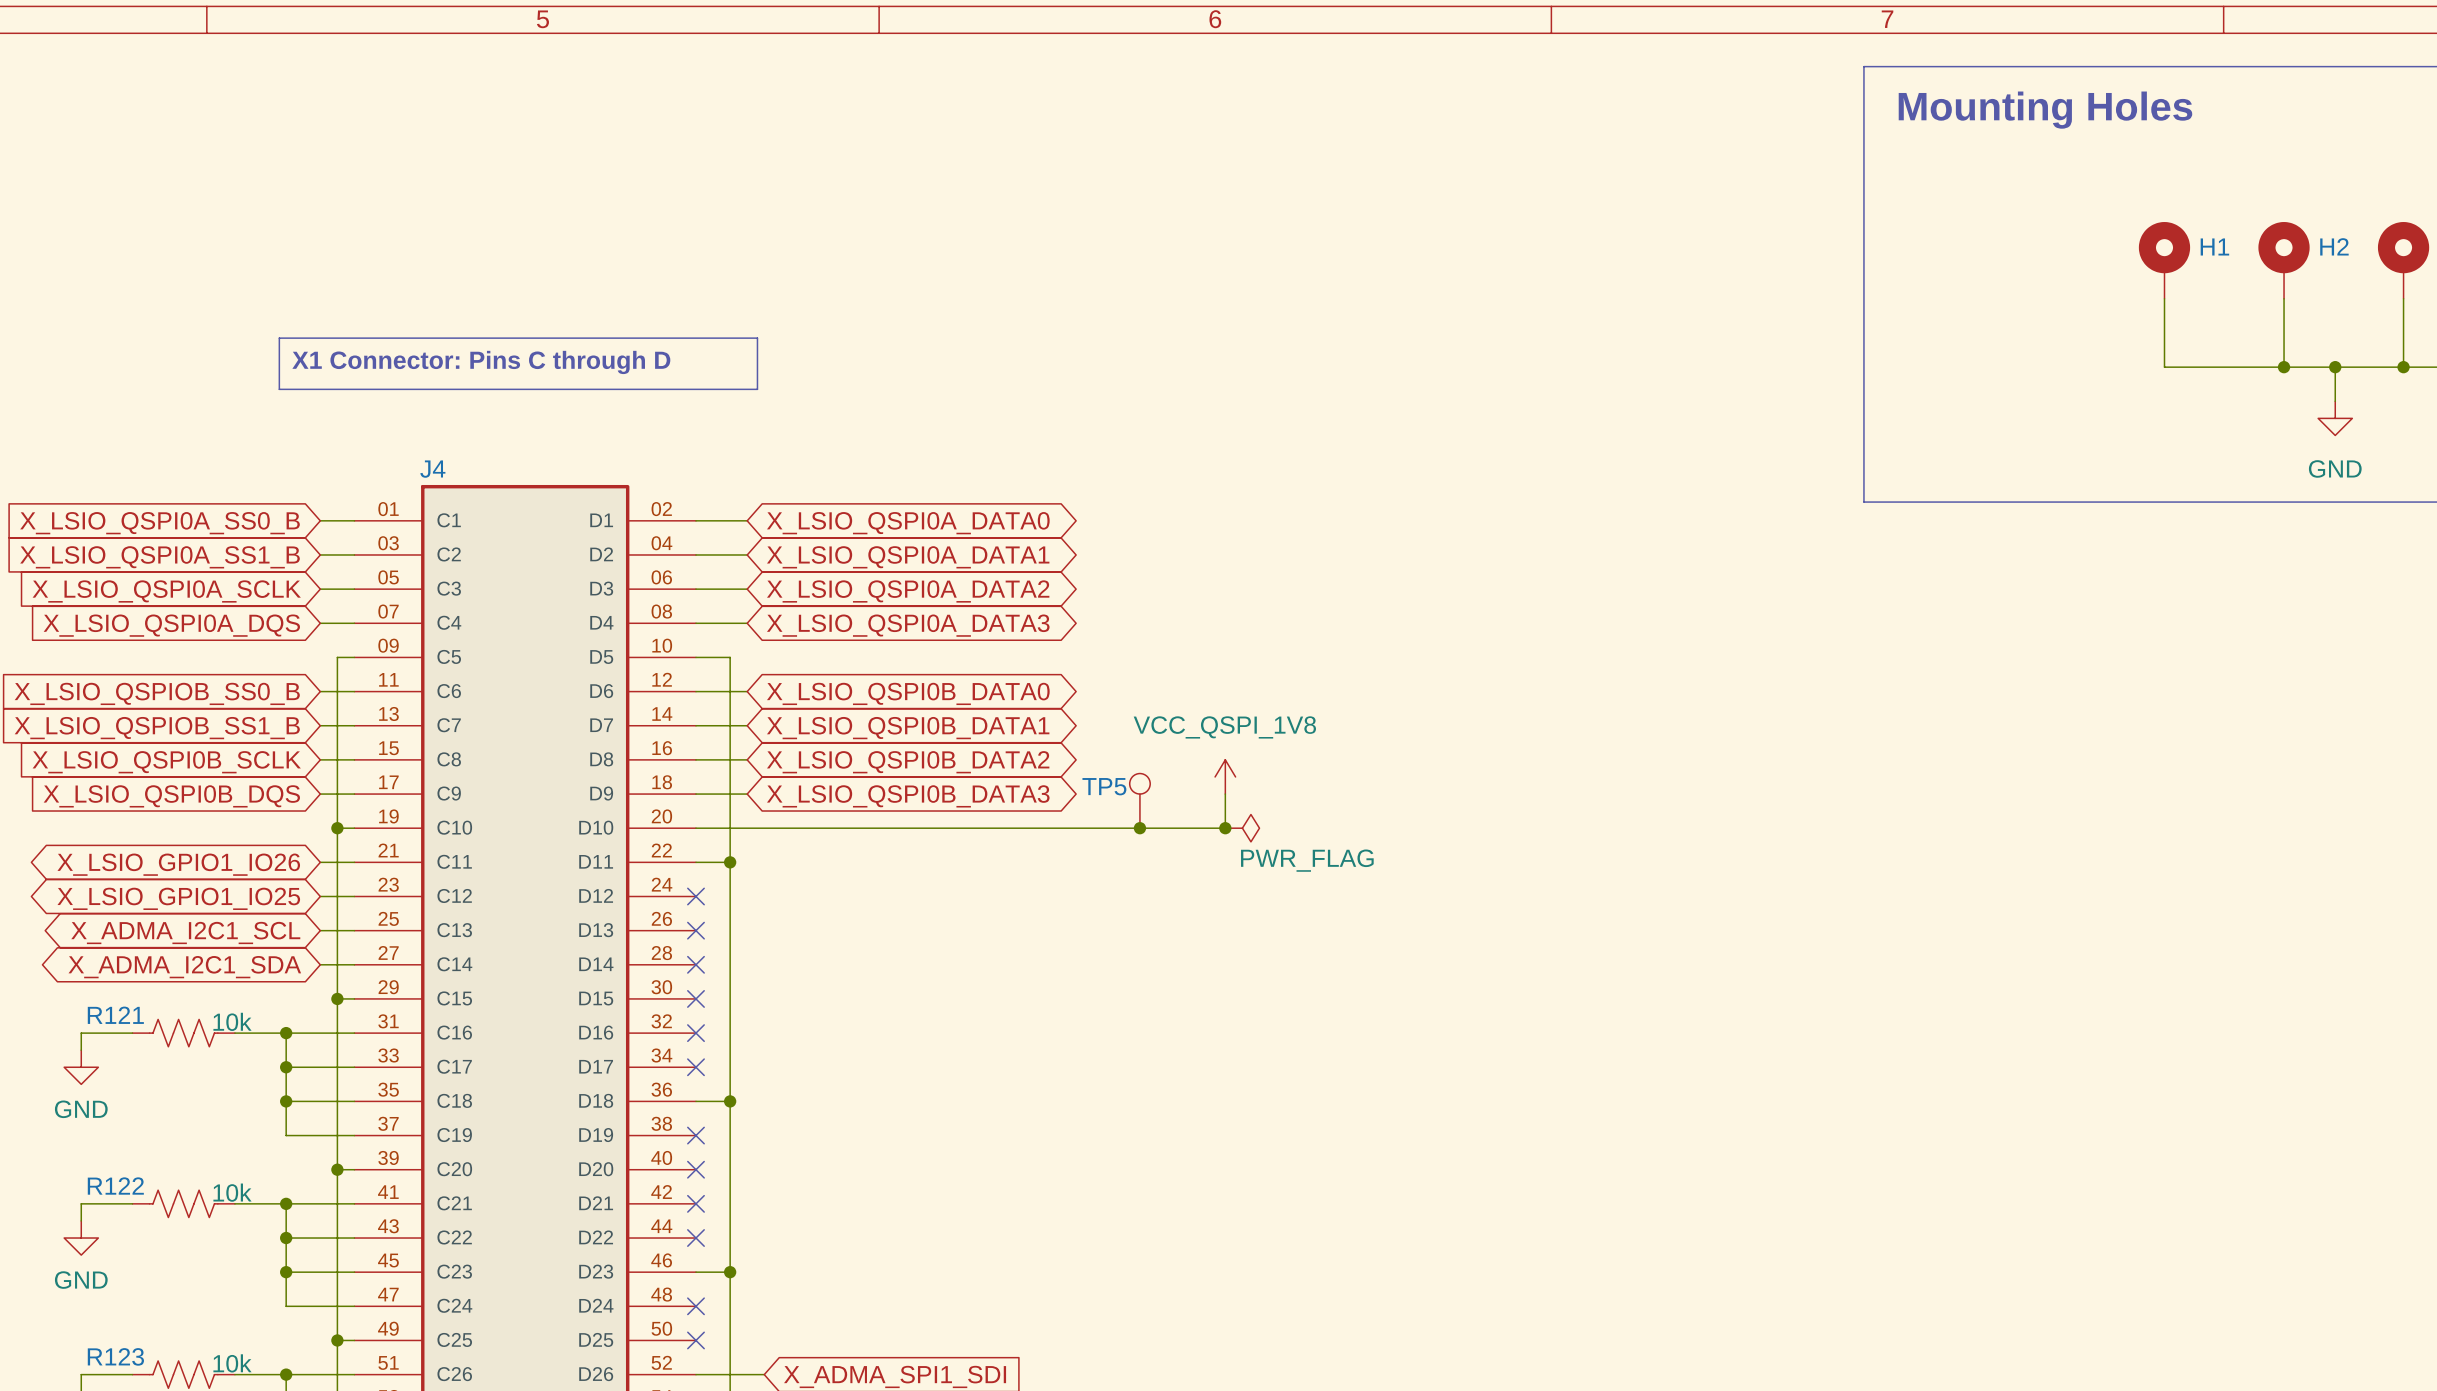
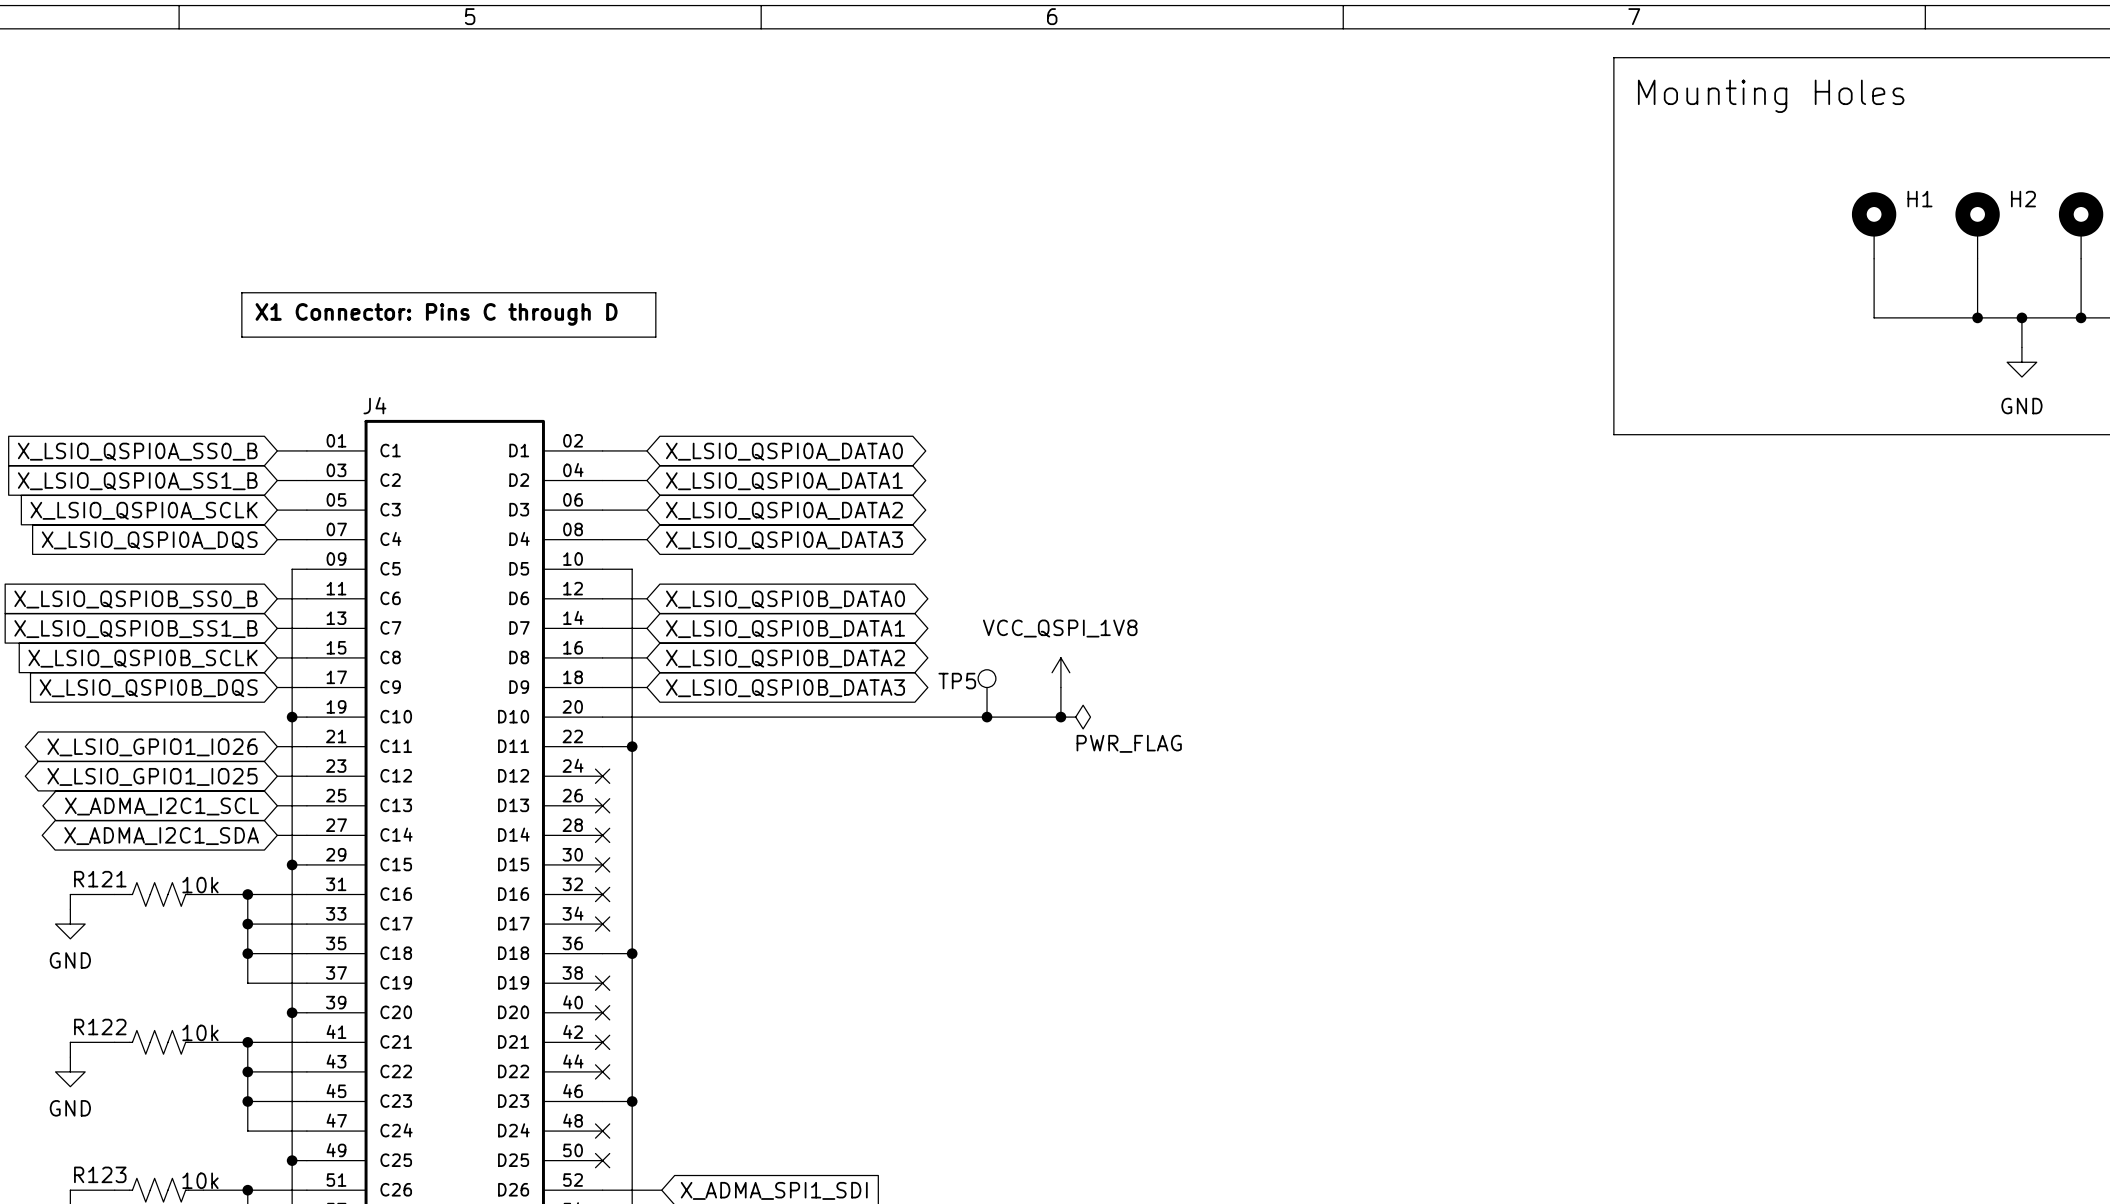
H1 name position: H1 (2214, 246) -> H1 (1919, 199)
H2 name position: H2 (2334, 246) -> H2 (2023, 199)

